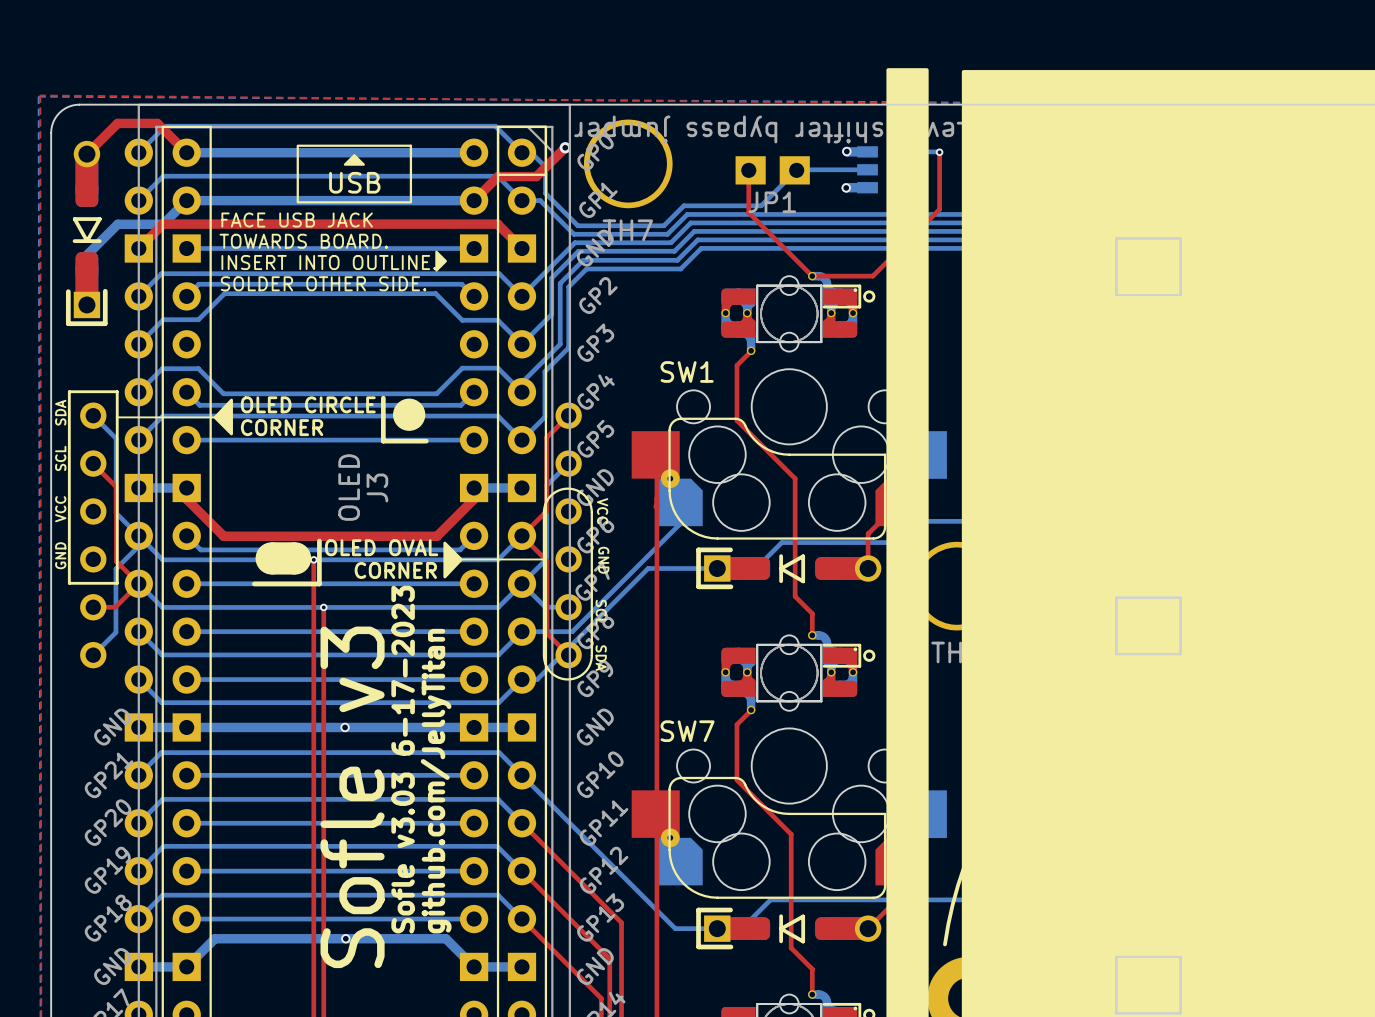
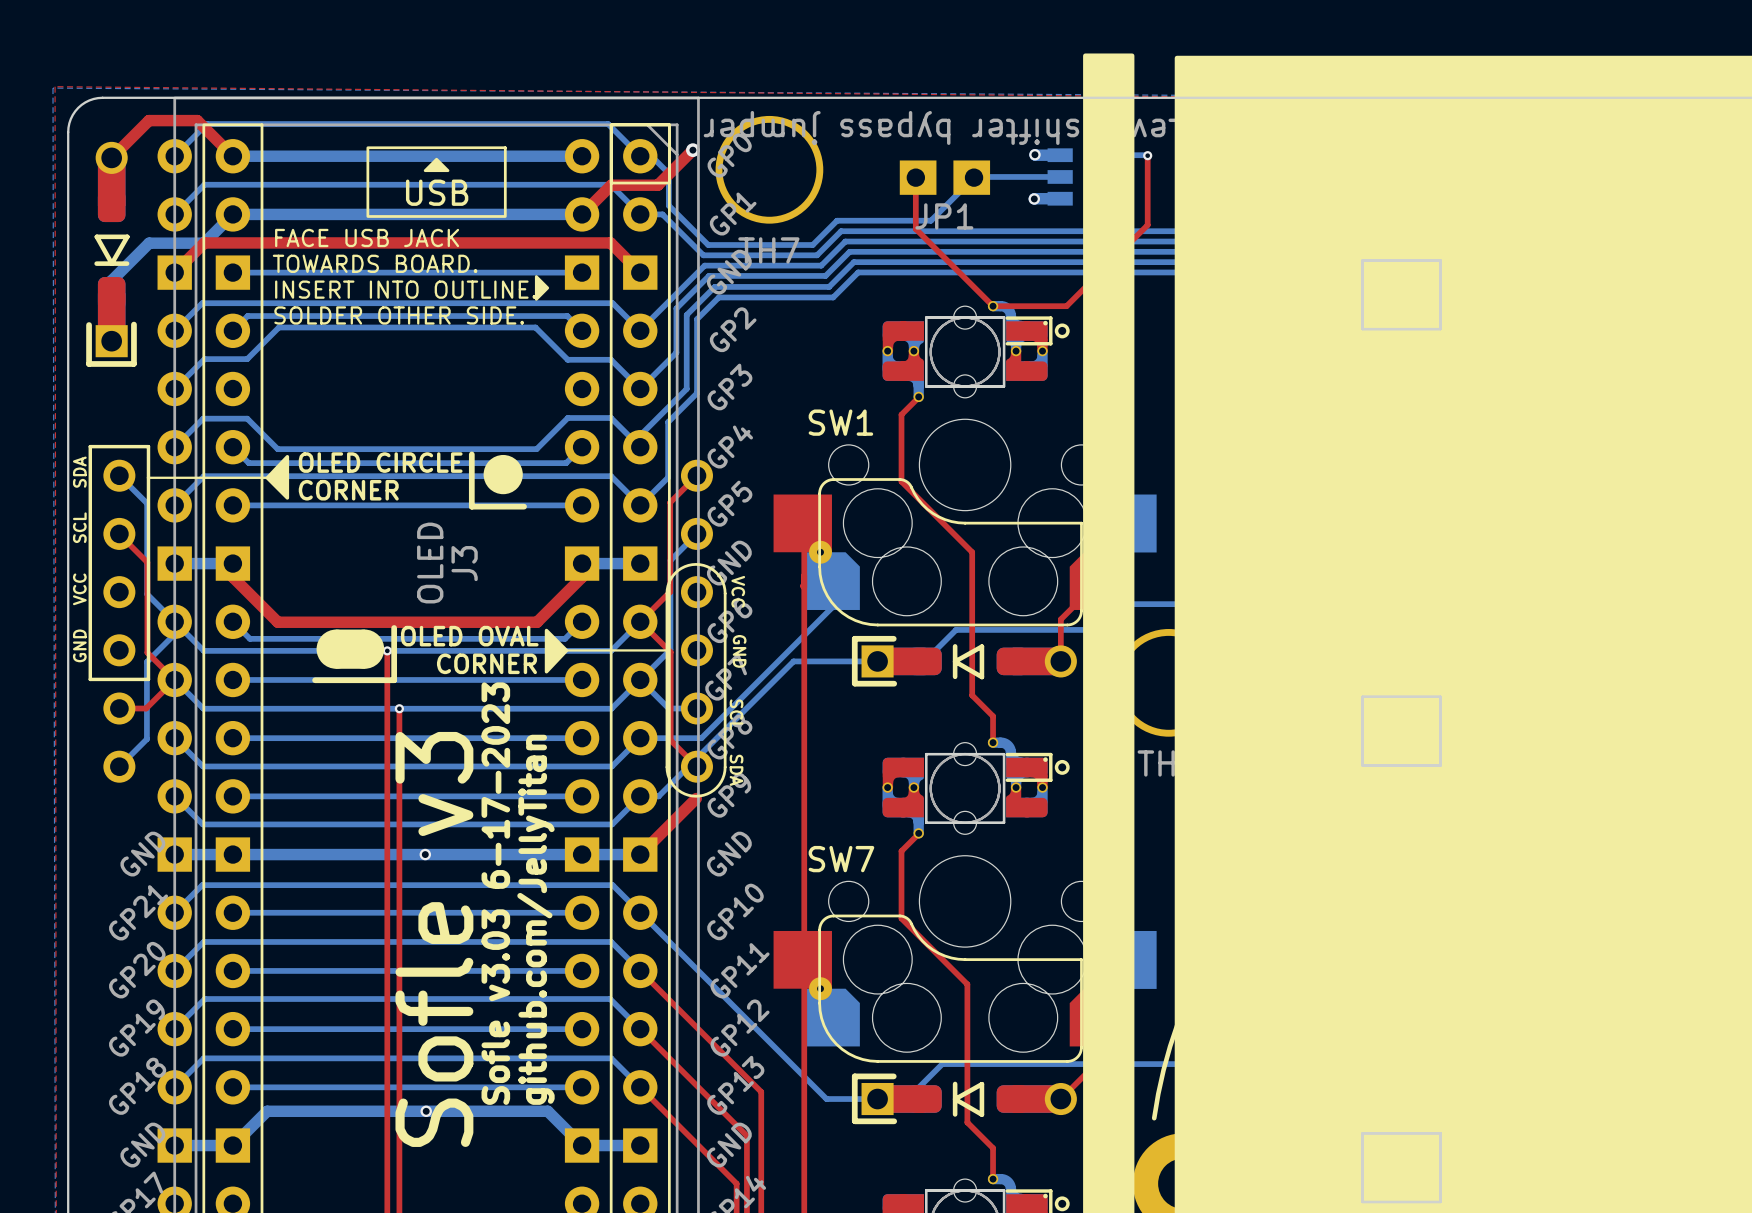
top track: none -> (696, 798) (640, 854)

